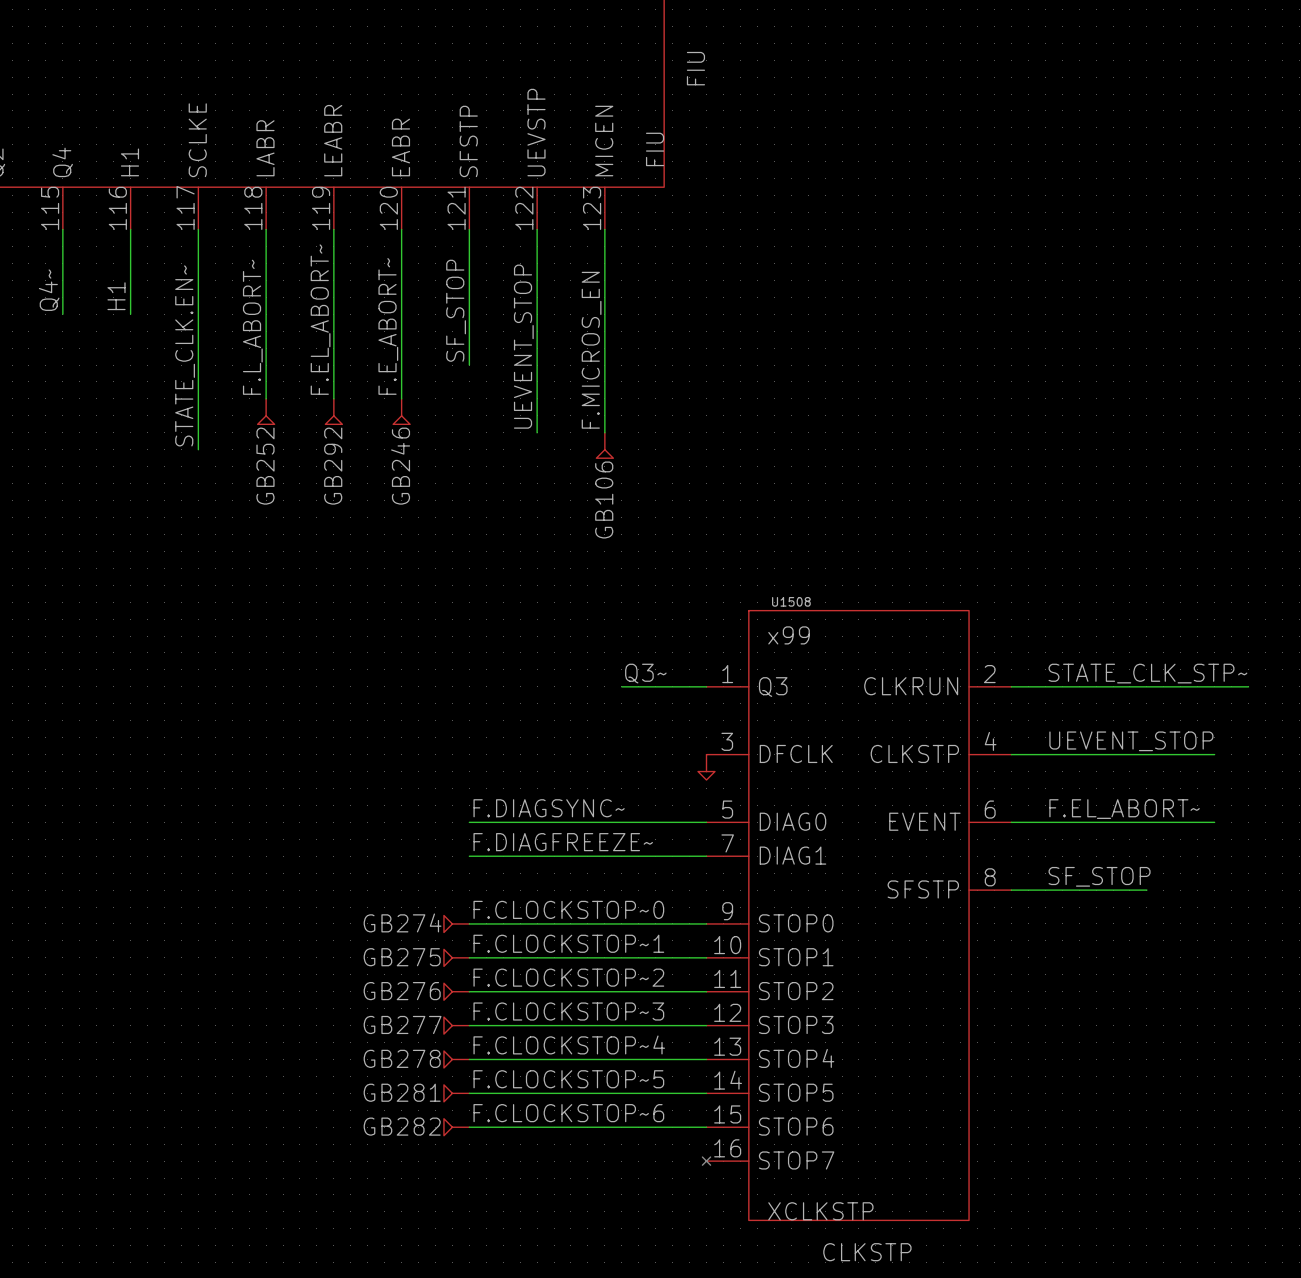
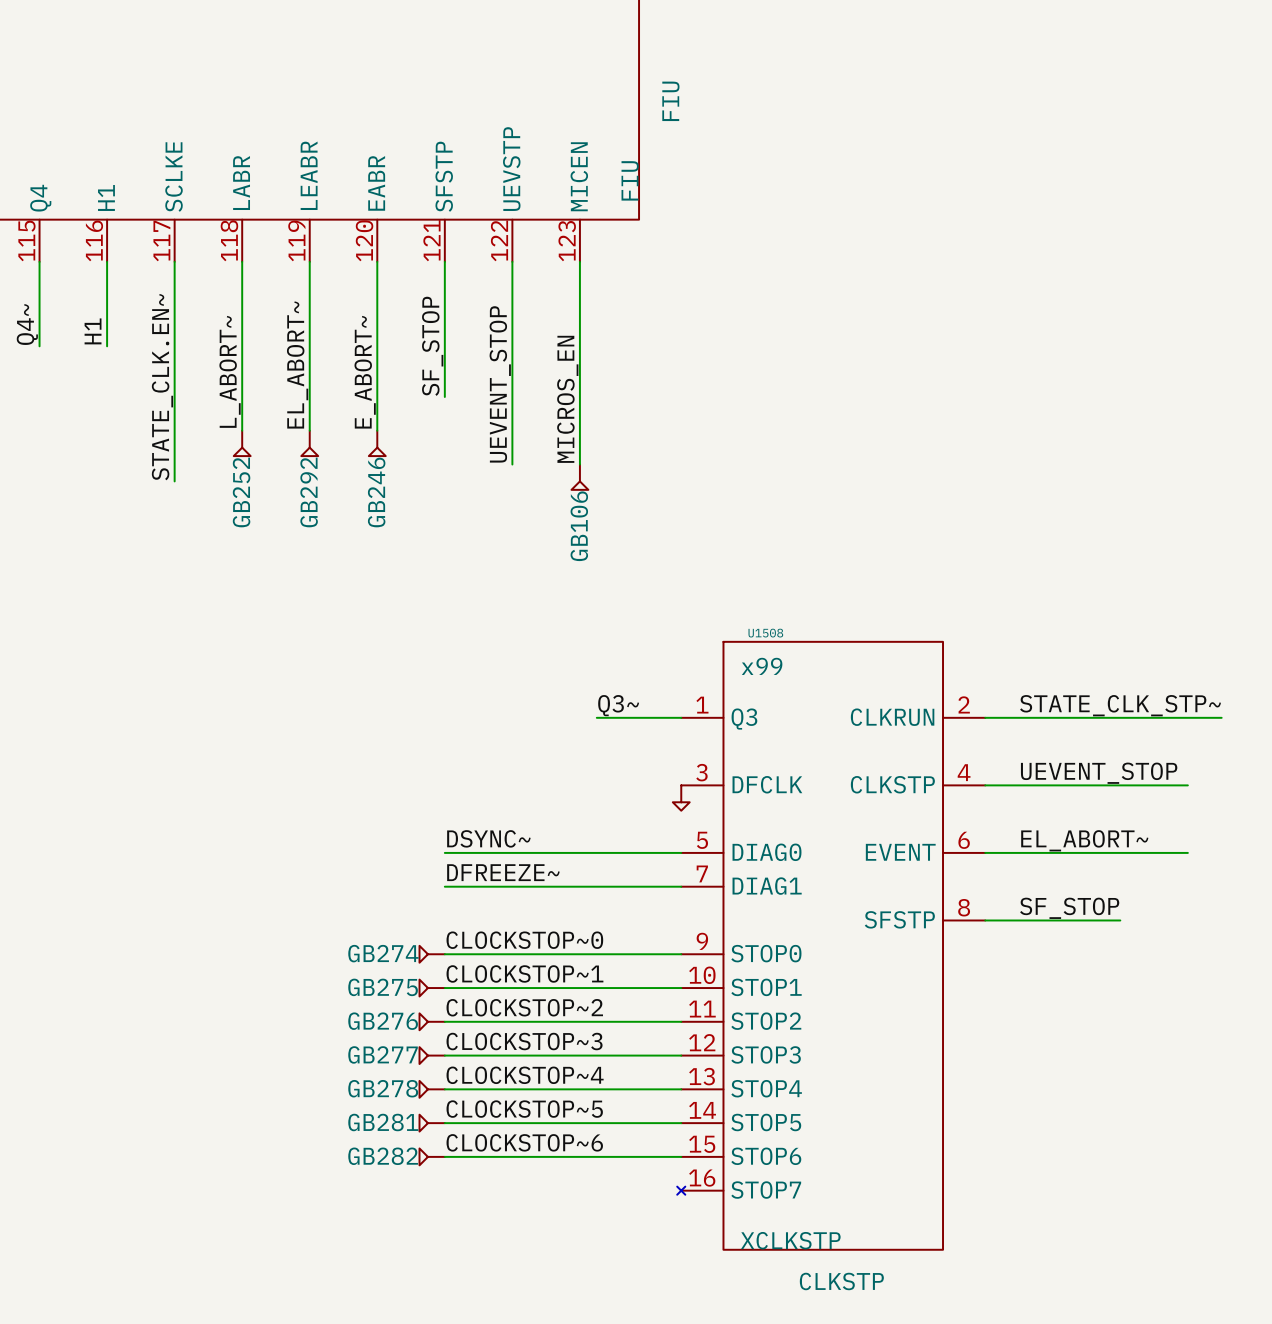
label: F.EL_ABORT~ (320, 319) -> EL_ABORT~ (297, 364)
label: F.E_ABORT~ (388, 326) -> E_ABORT~ (365, 372)
label: F.L_ABORT~ (252, 327) -> L_ABORT~ (230, 371)
label: F.MICROS_EN (591, 350) -> MICROS_EN (567, 399)
label: F.DIAGSYNC~ (549, 808) -> DSYNC~ (488, 838)
label: F.EL_ABORT~ (1124, 809) -> EL_ABORT~ (1084, 840)
label: F.DIAGFREEZE~ (563, 842) -> DFREEZE~ (503, 872)
label: F.CLOCKSTOP~0 (568, 909) -> CLOCKSTOP~0 (524, 940)
label: F.CLOCKSTOP~1 (568, 943) -> CLOCKSTOP~1 (524, 973)
label: F.CLOCKSTOP~2 (568, 977) -> CLOCKSTOP~2 (524, 1007)
label: F.CLOCKSTOP~3 (568, 1011) -> CLOCKSTOP~3 (524, 1041)
label: F.CLOCKSTOP~4 (569, 1044) -> CLOCKSTOP~4 (525, 1075)
label: F.CLOCKSTOP~5 (568, 1079) -> CLOCKSTOP~5 (524, 1109)
label: F.CLOCKSTOP~6 (568, 1113) -> CLOCKSTOP~6 (524, 1142)

